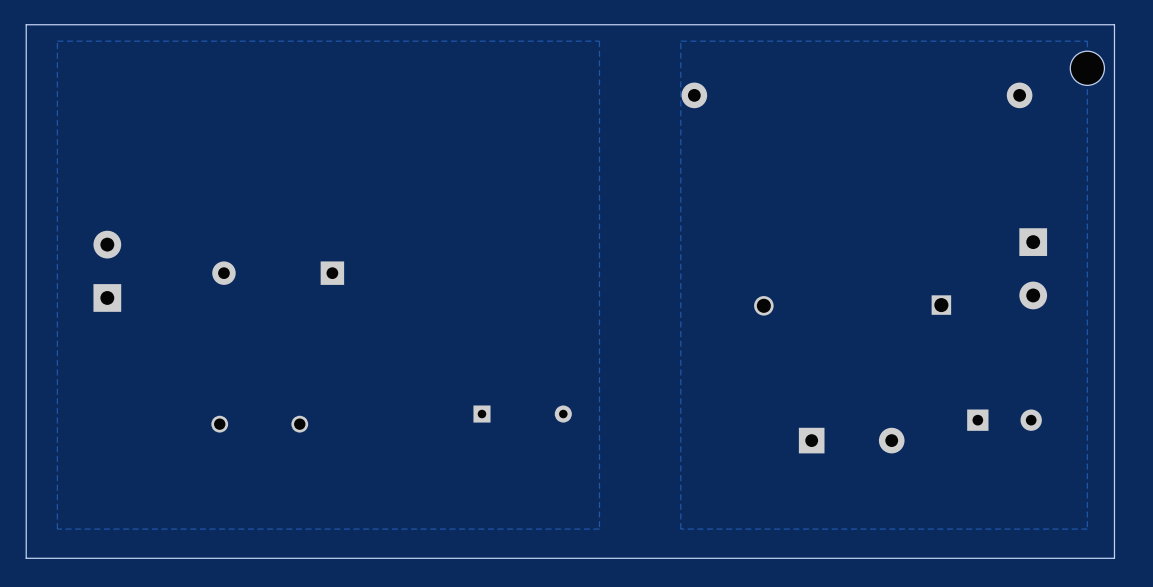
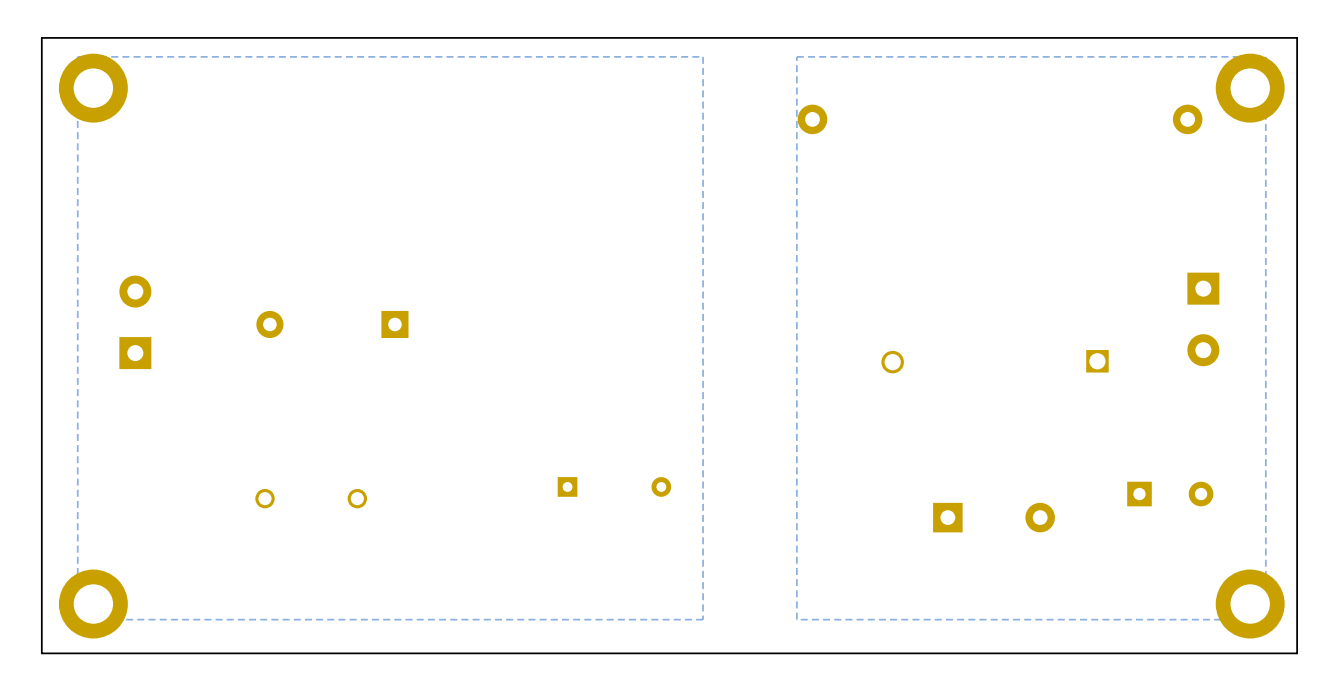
part: none -> (93, 88)
part: none -> (1250, 88)
part: (1087, 68) -> none
part: none -> (93, 604)
part: none -> (1250, 604)

